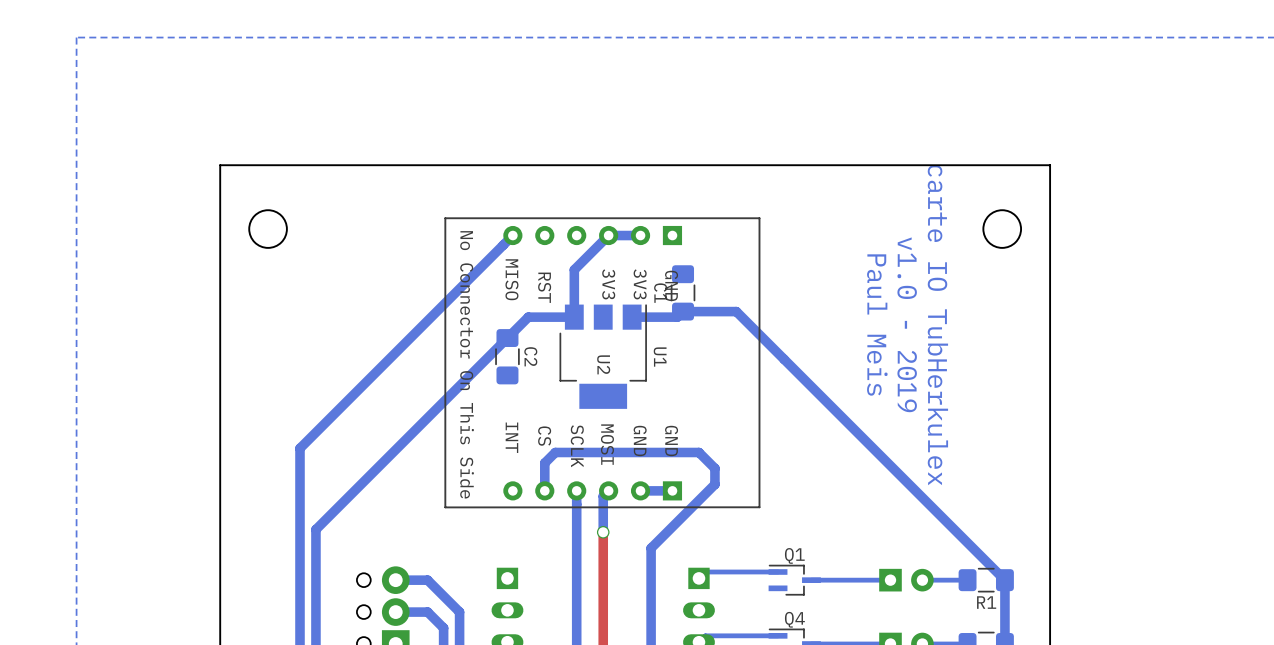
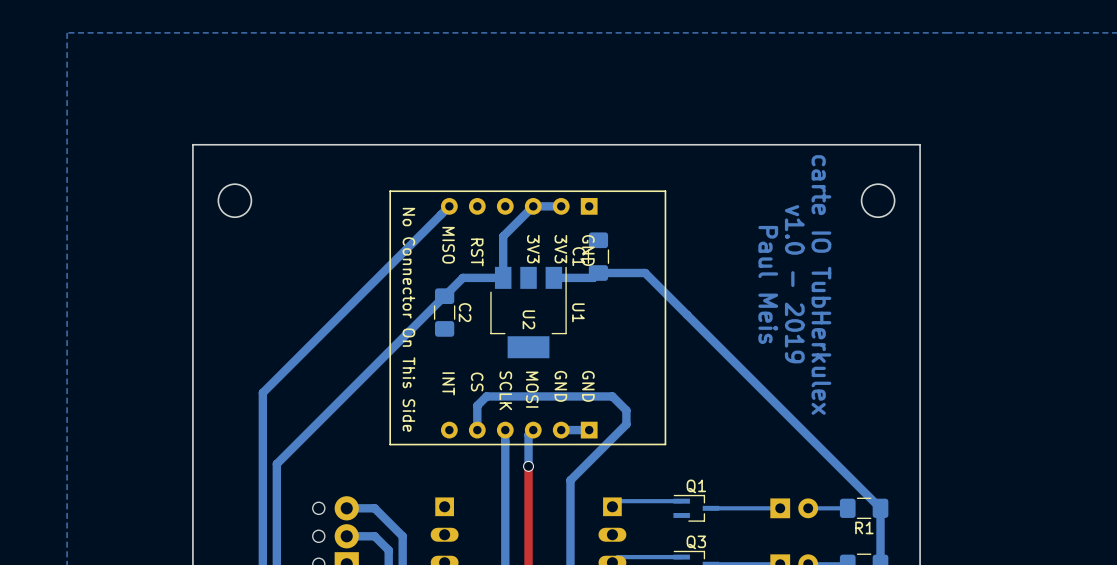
Q4 name: Q4 (794, 619) -> Q3 (696, 542)

